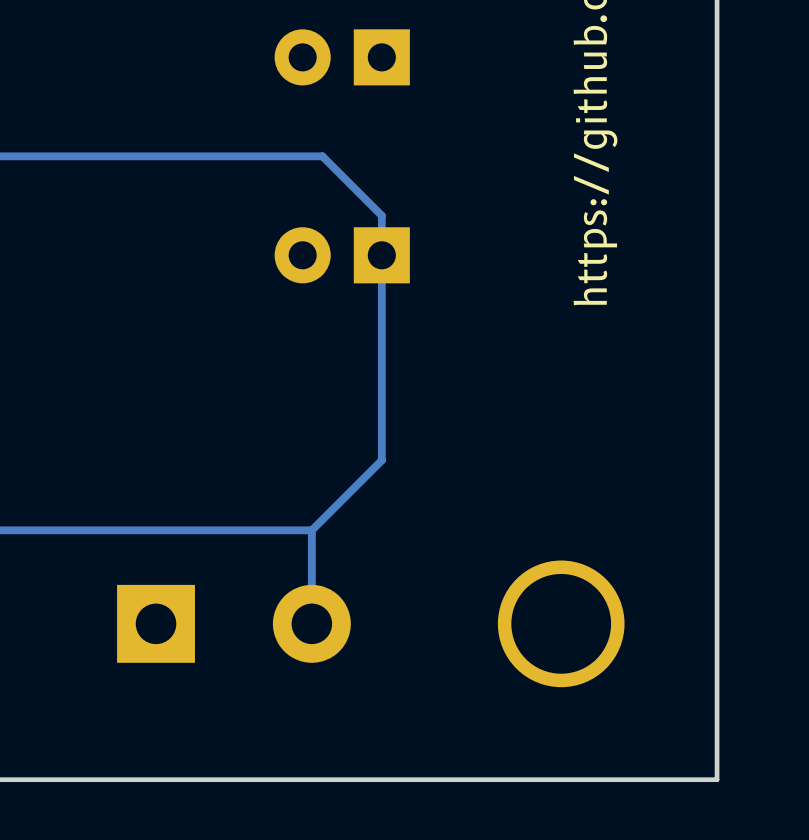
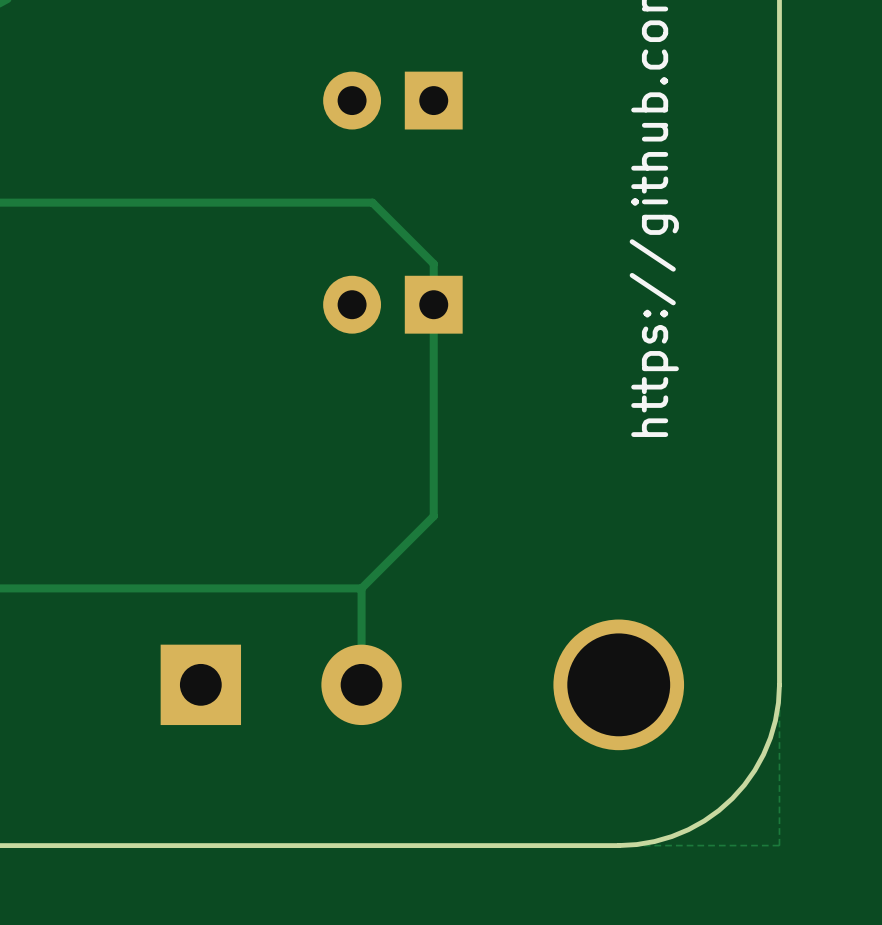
board edge: (717, 623) (717, 779) (561, 779) -> (779, 684) (778, 702) (770, 737) (754, 770) (732, 798) (704, 820) (671, 836) (636, 844) (618, 845)

